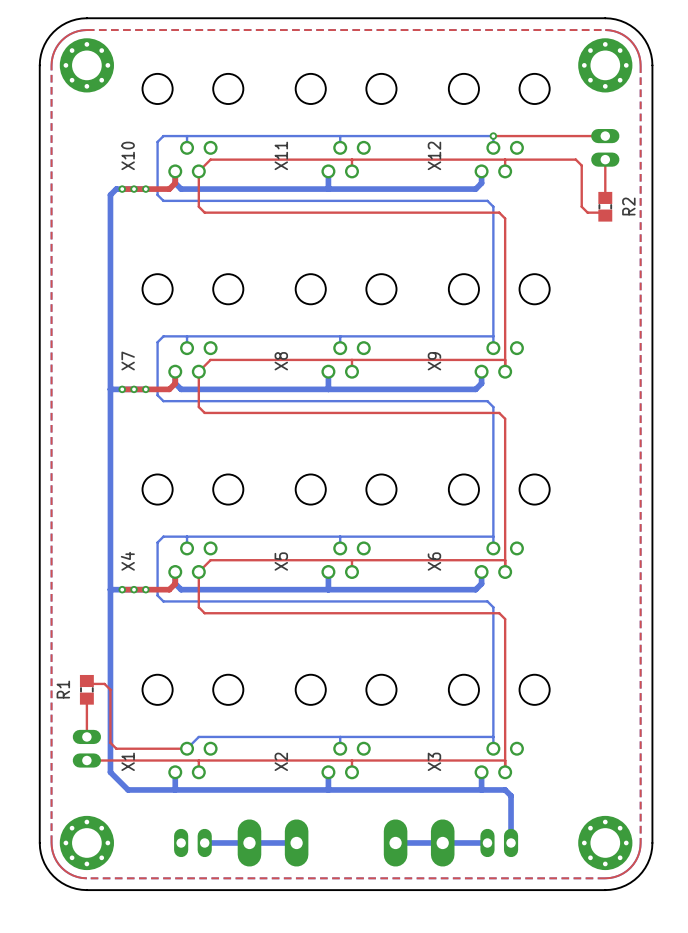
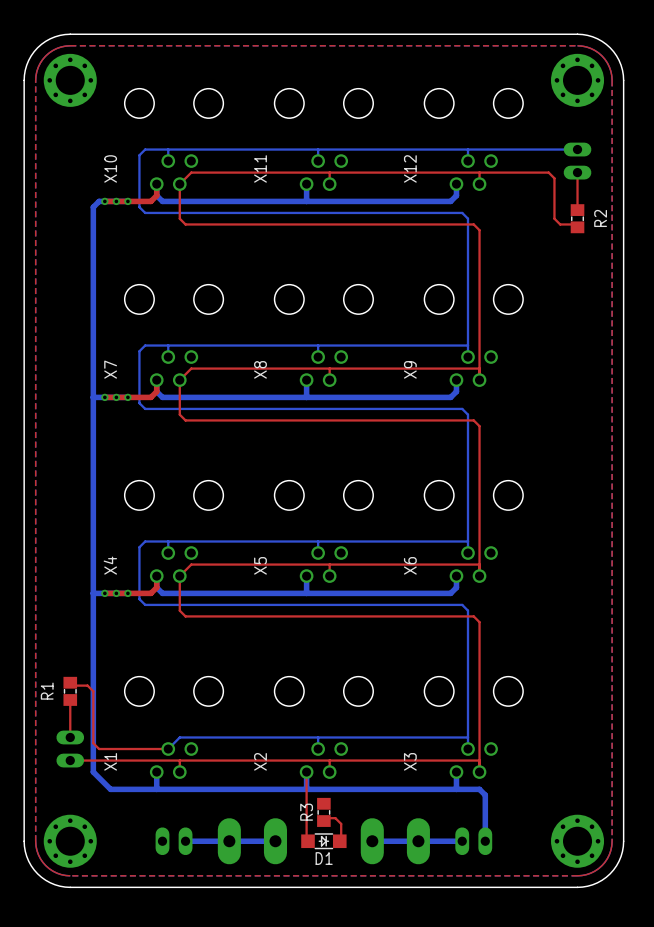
bottom track: none -> (468, 149) (577, 149)
top track: (493, 136) (605, 136) -> none
via: (493, 136) -> none
top track: none -> (306, 772) (308, 841)
R3: none -> (323, 812)
top track: none -> (323, 821) (326, 818) (335, 818) (341, 823) (339, 841)
D1: none -> (323, 841)

